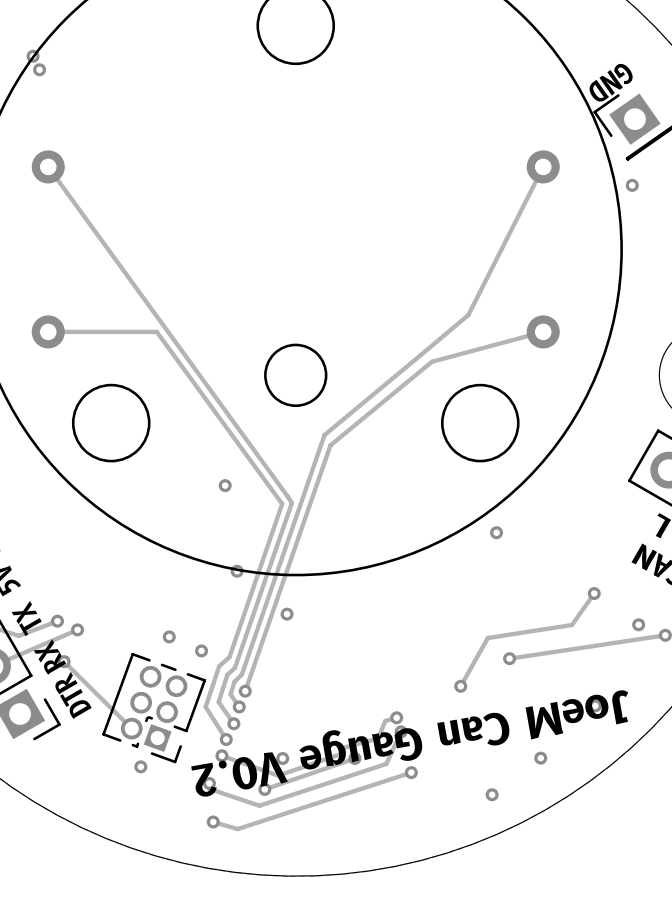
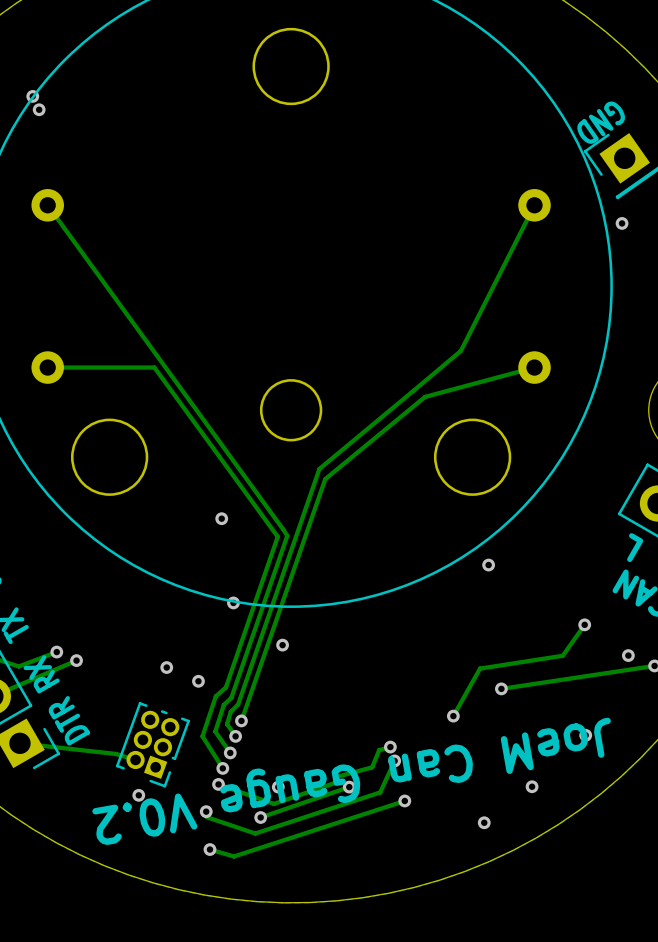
part footprint: [102, 652, 207, 764] -> [115, 702, 190, 788]
track: (64, 661) (131, 728) -> none
via: (64, 661) -> none
track: none -> (20, 743) (116, 754) (135, 759)

